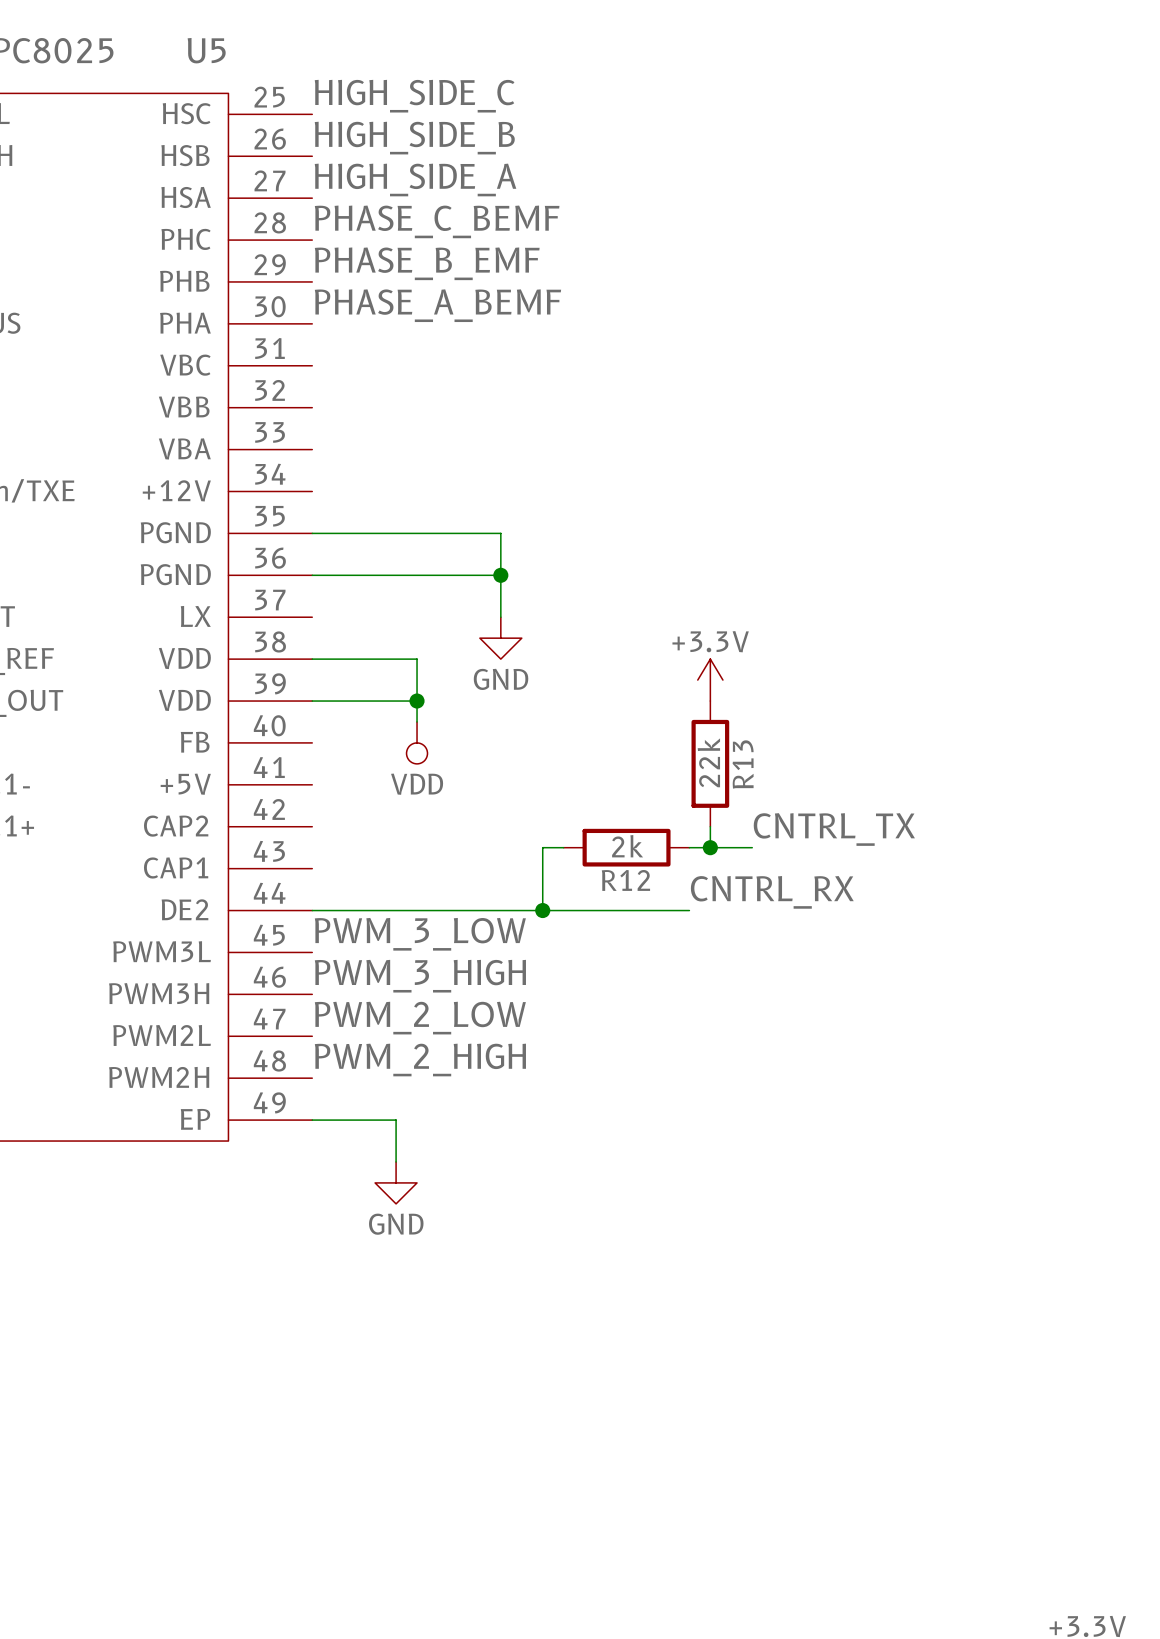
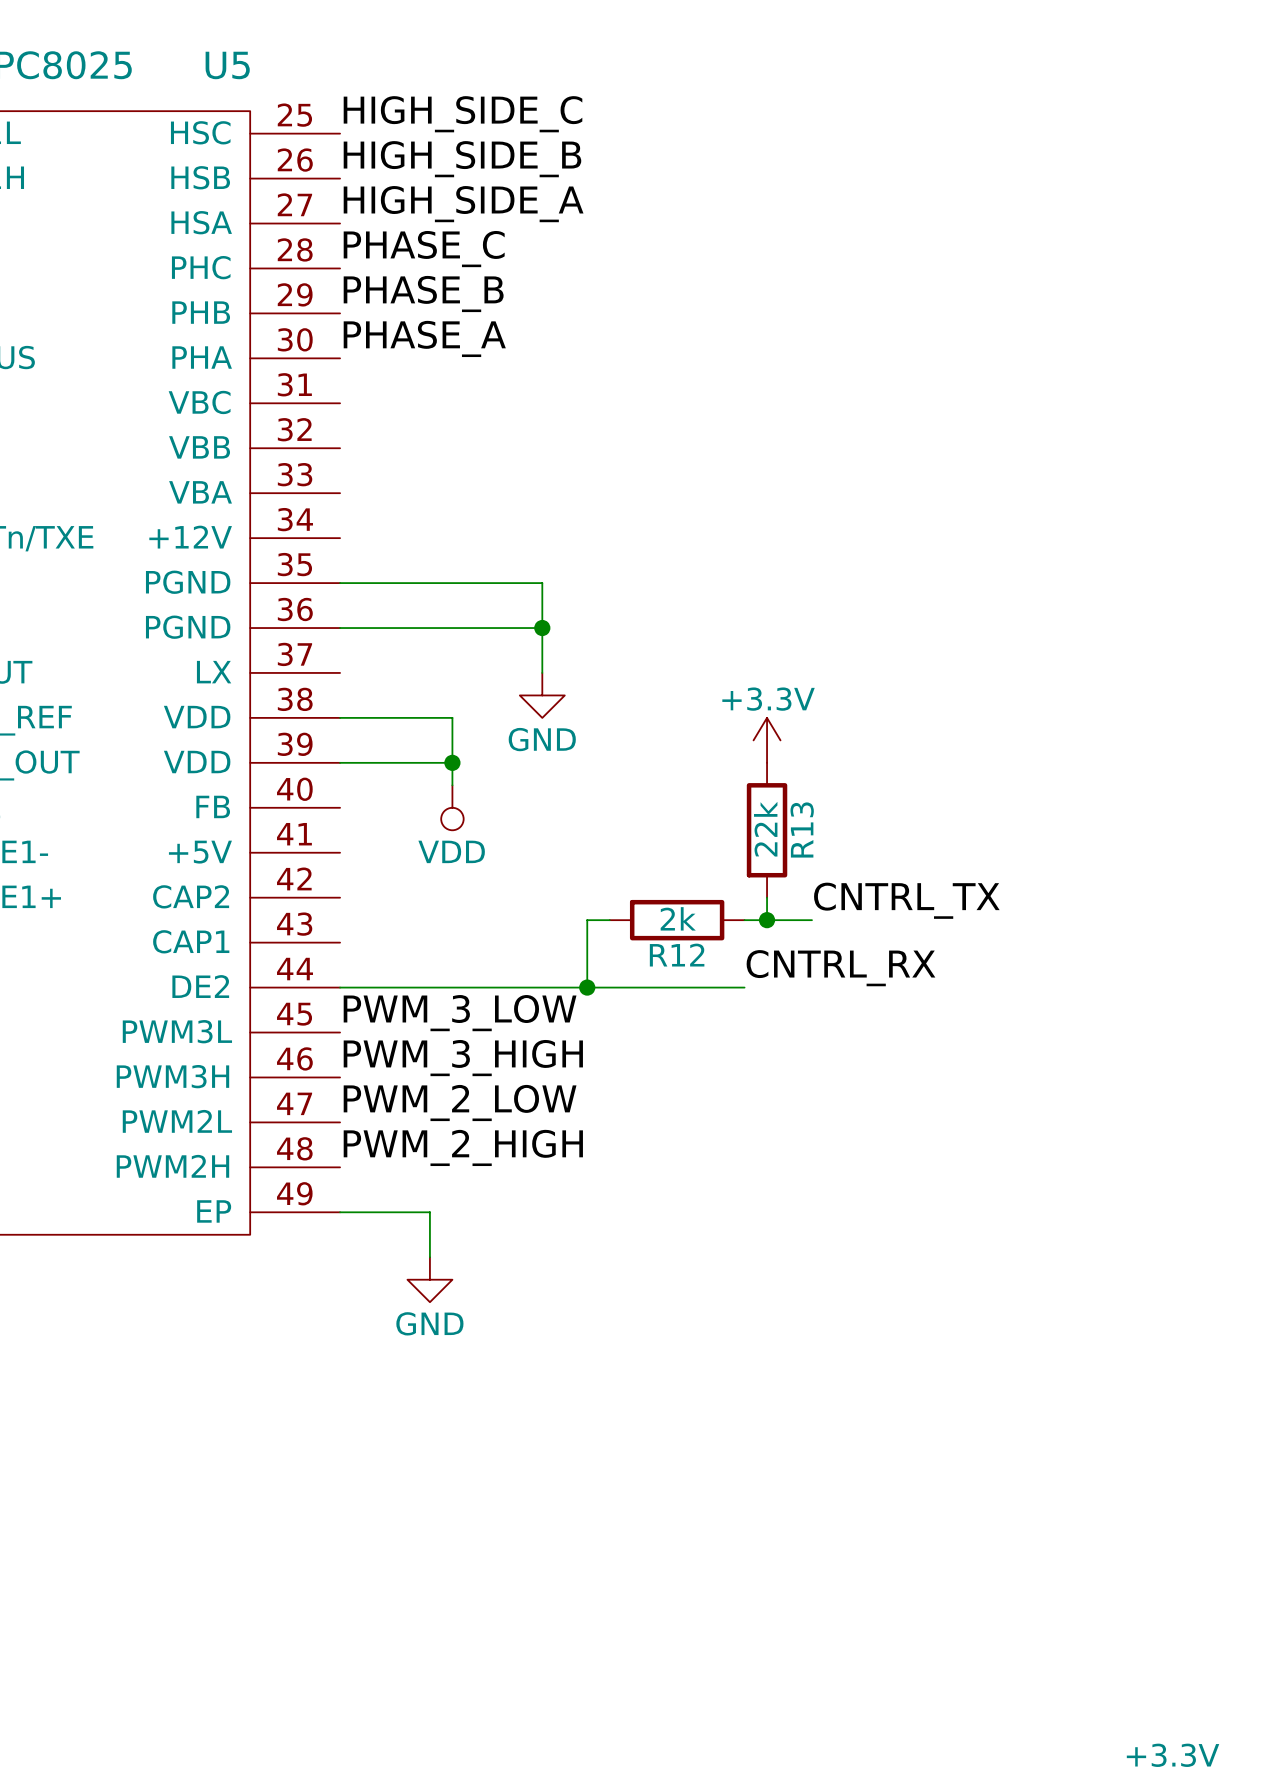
label: PHASE_C_BEMF (437, 221) -> PHASE_C (424, 249)
label: PHASE_B_EMF (427, 263) -> PHASE_B (423, 294)
label: PHASE_A_BEMF (437, 305) -> PHASE_A (424, 338)

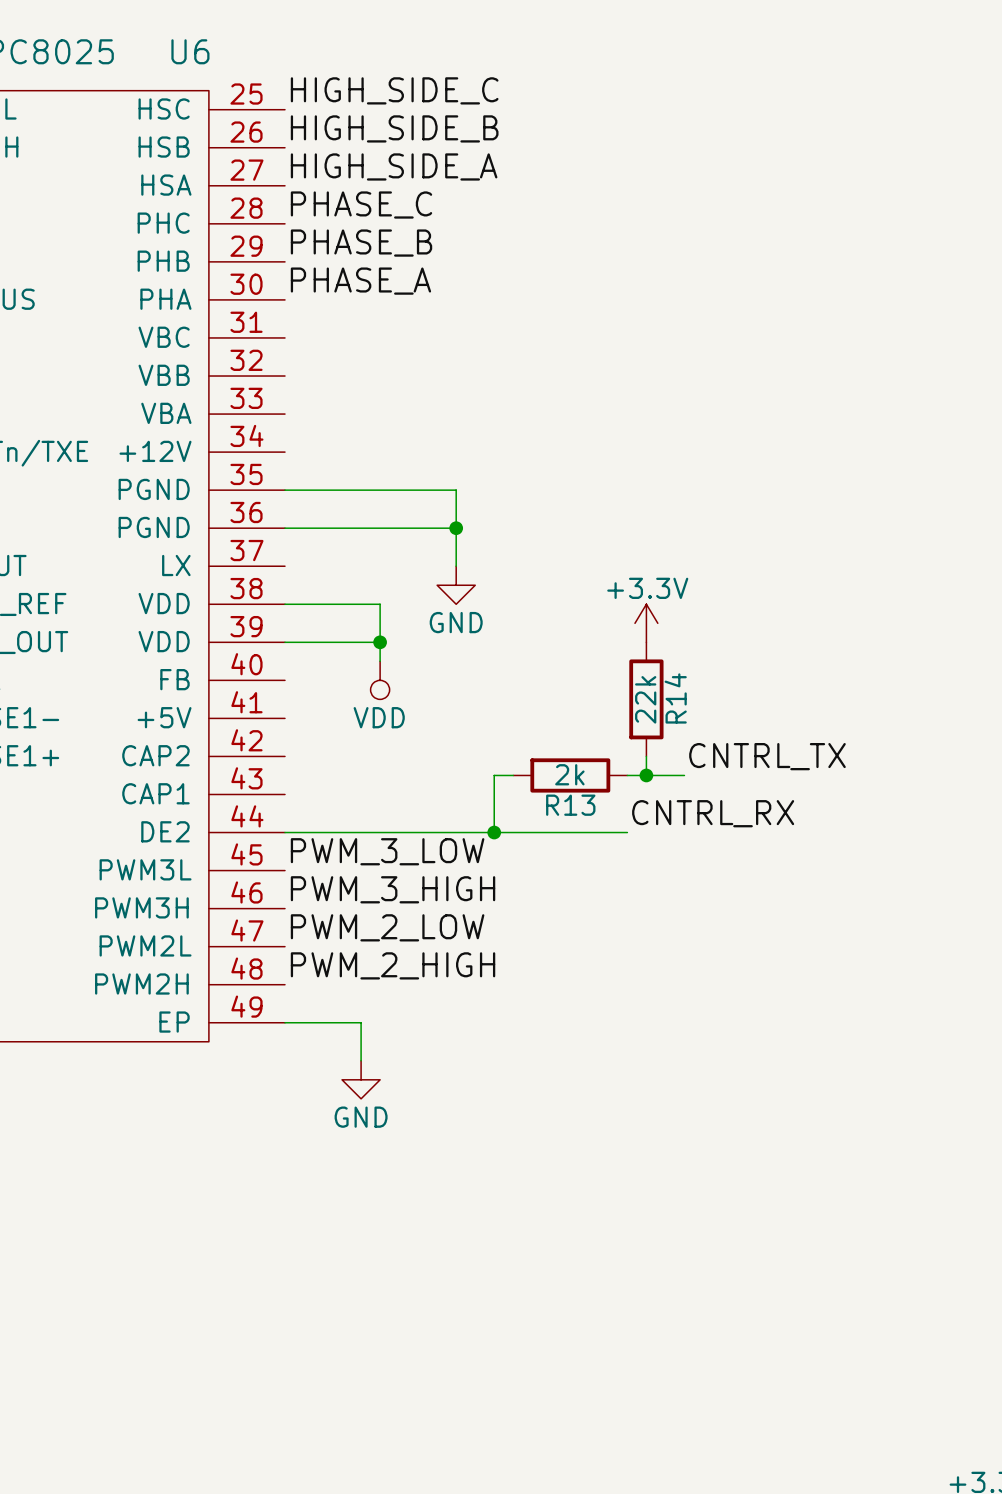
U5 name: U5 (227, 65) -> U6 (190, 51)
R13 name: R13 (802, 829) -> R14 (675, 698)
R12 name: R12 (677, 955) -> R13 (570, 805)

